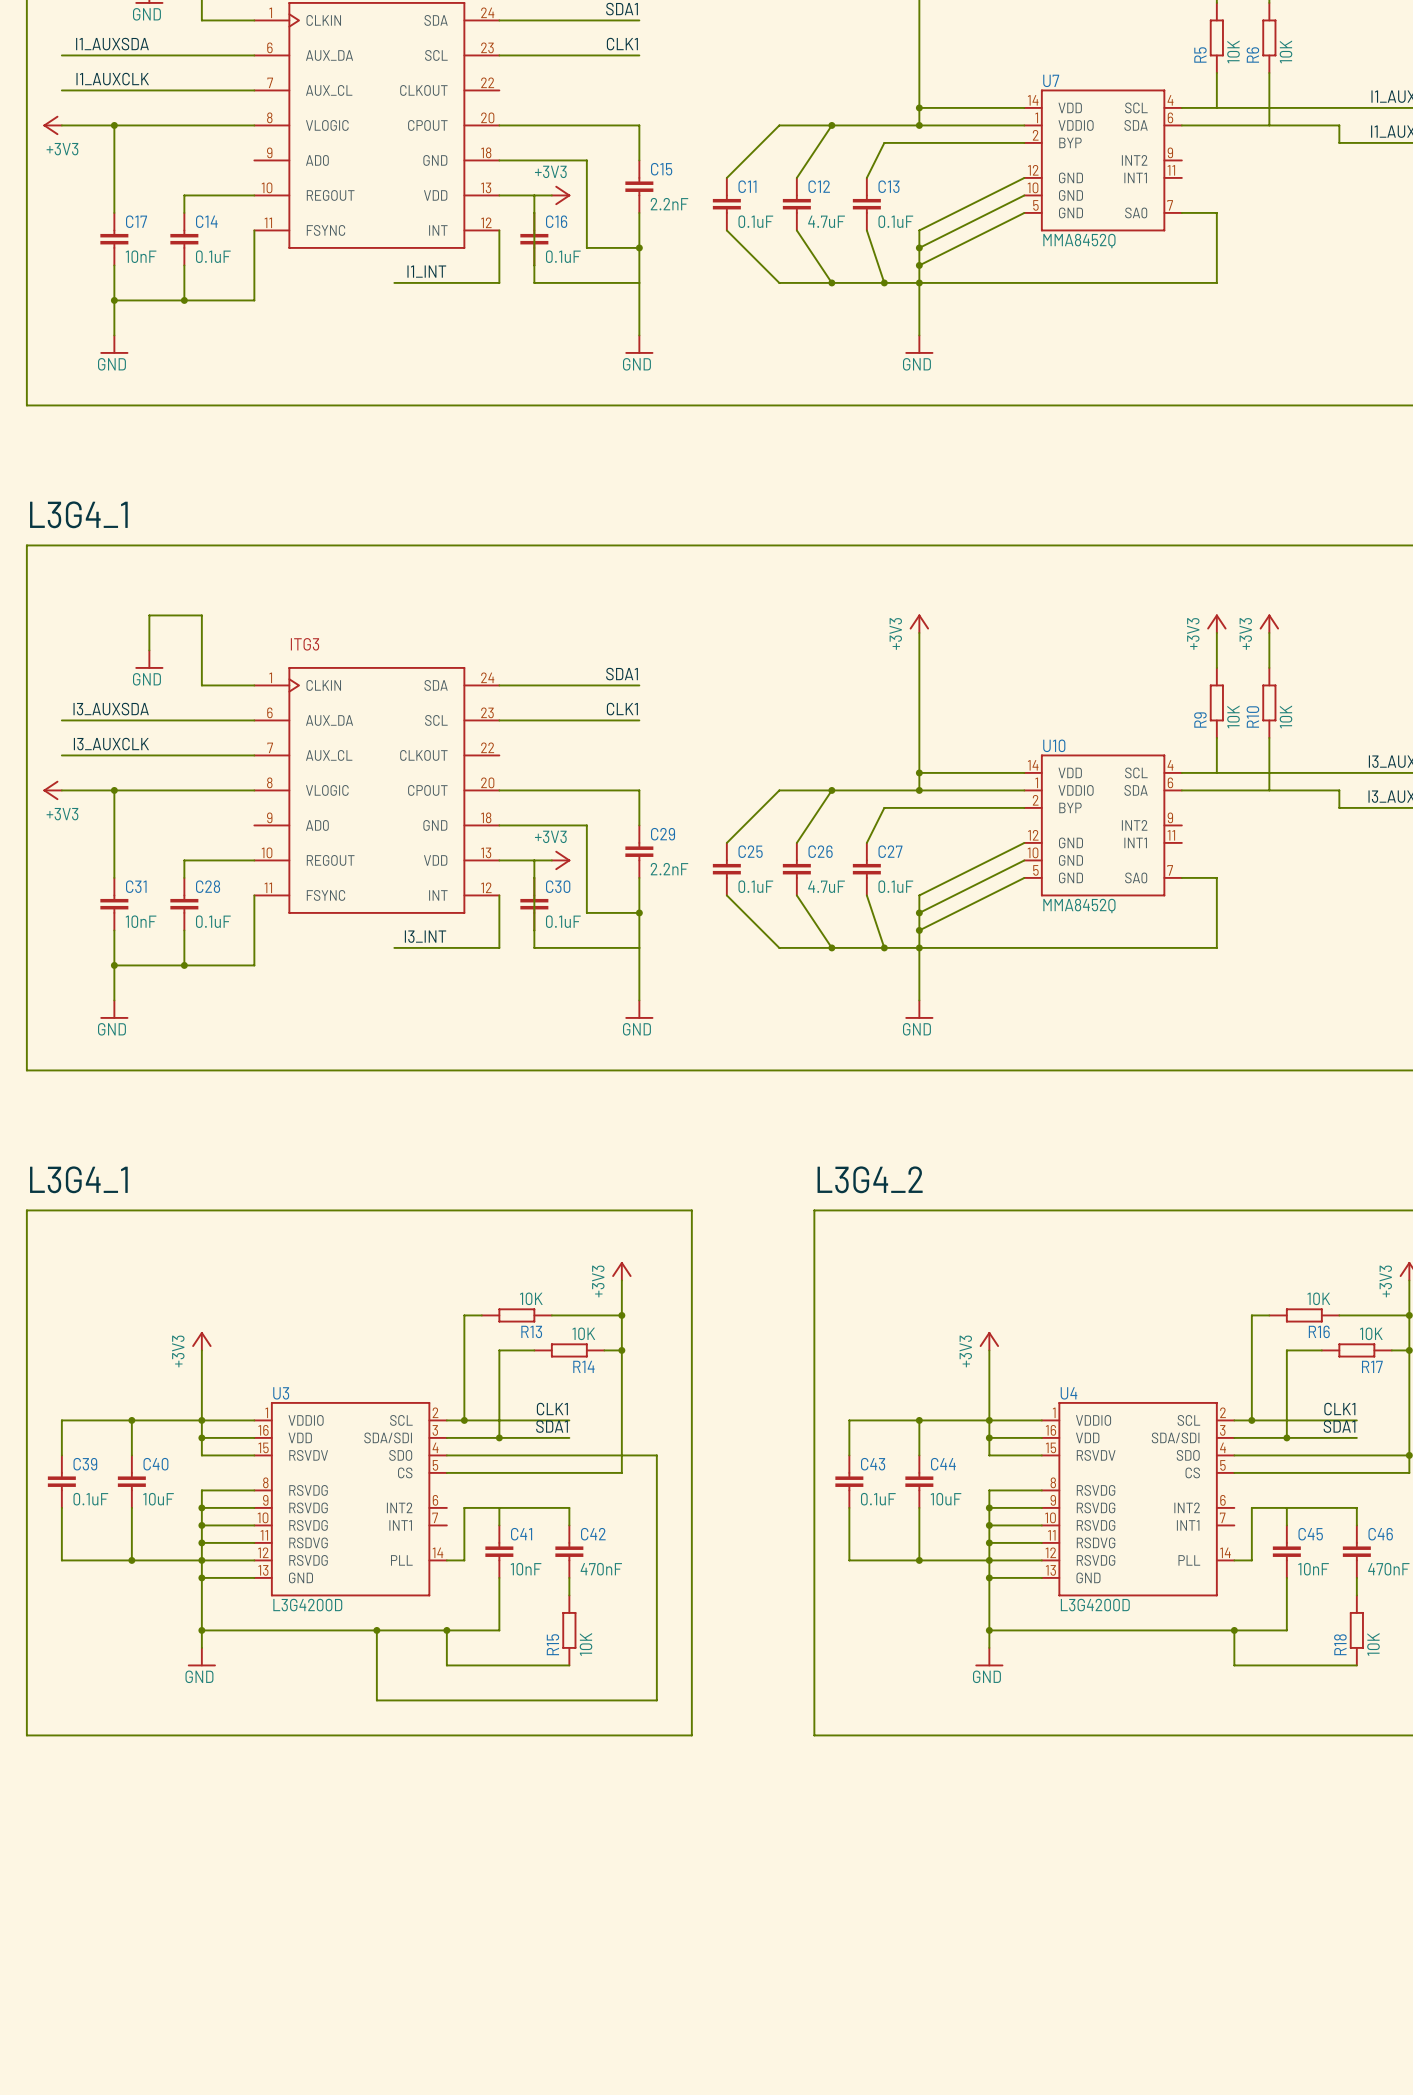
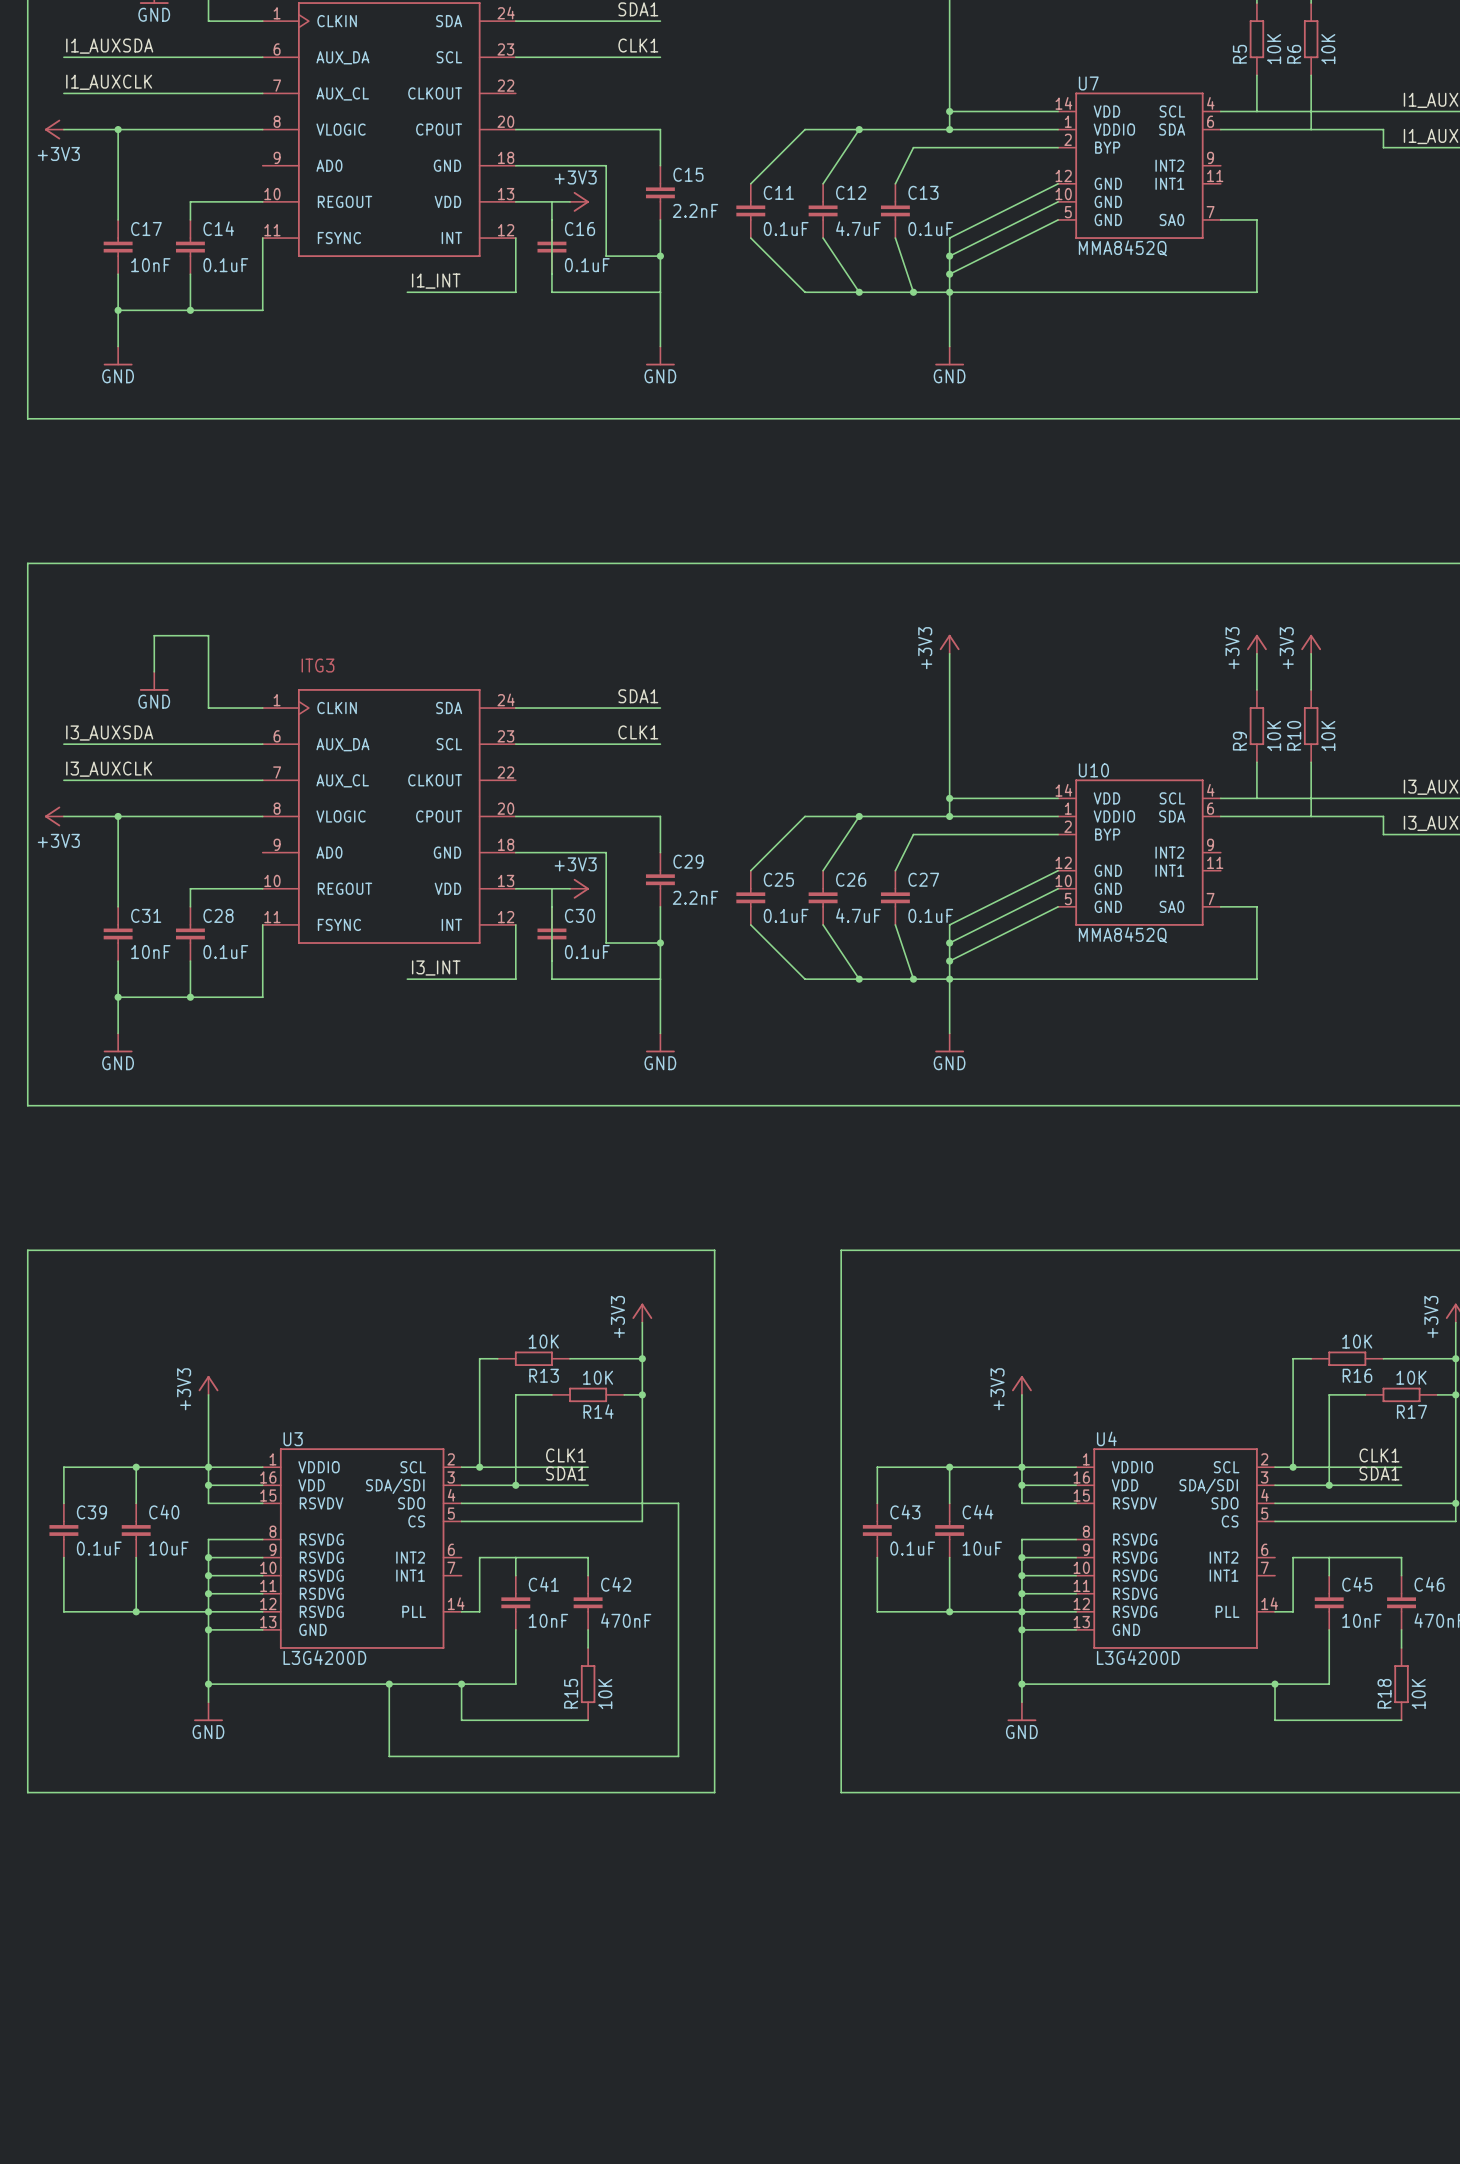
label: L3G4_1 (78, 514) -> none
label: L3G4_1 (78, 1179) -> none
label: L3G4_2 (870, 1179) -> none

